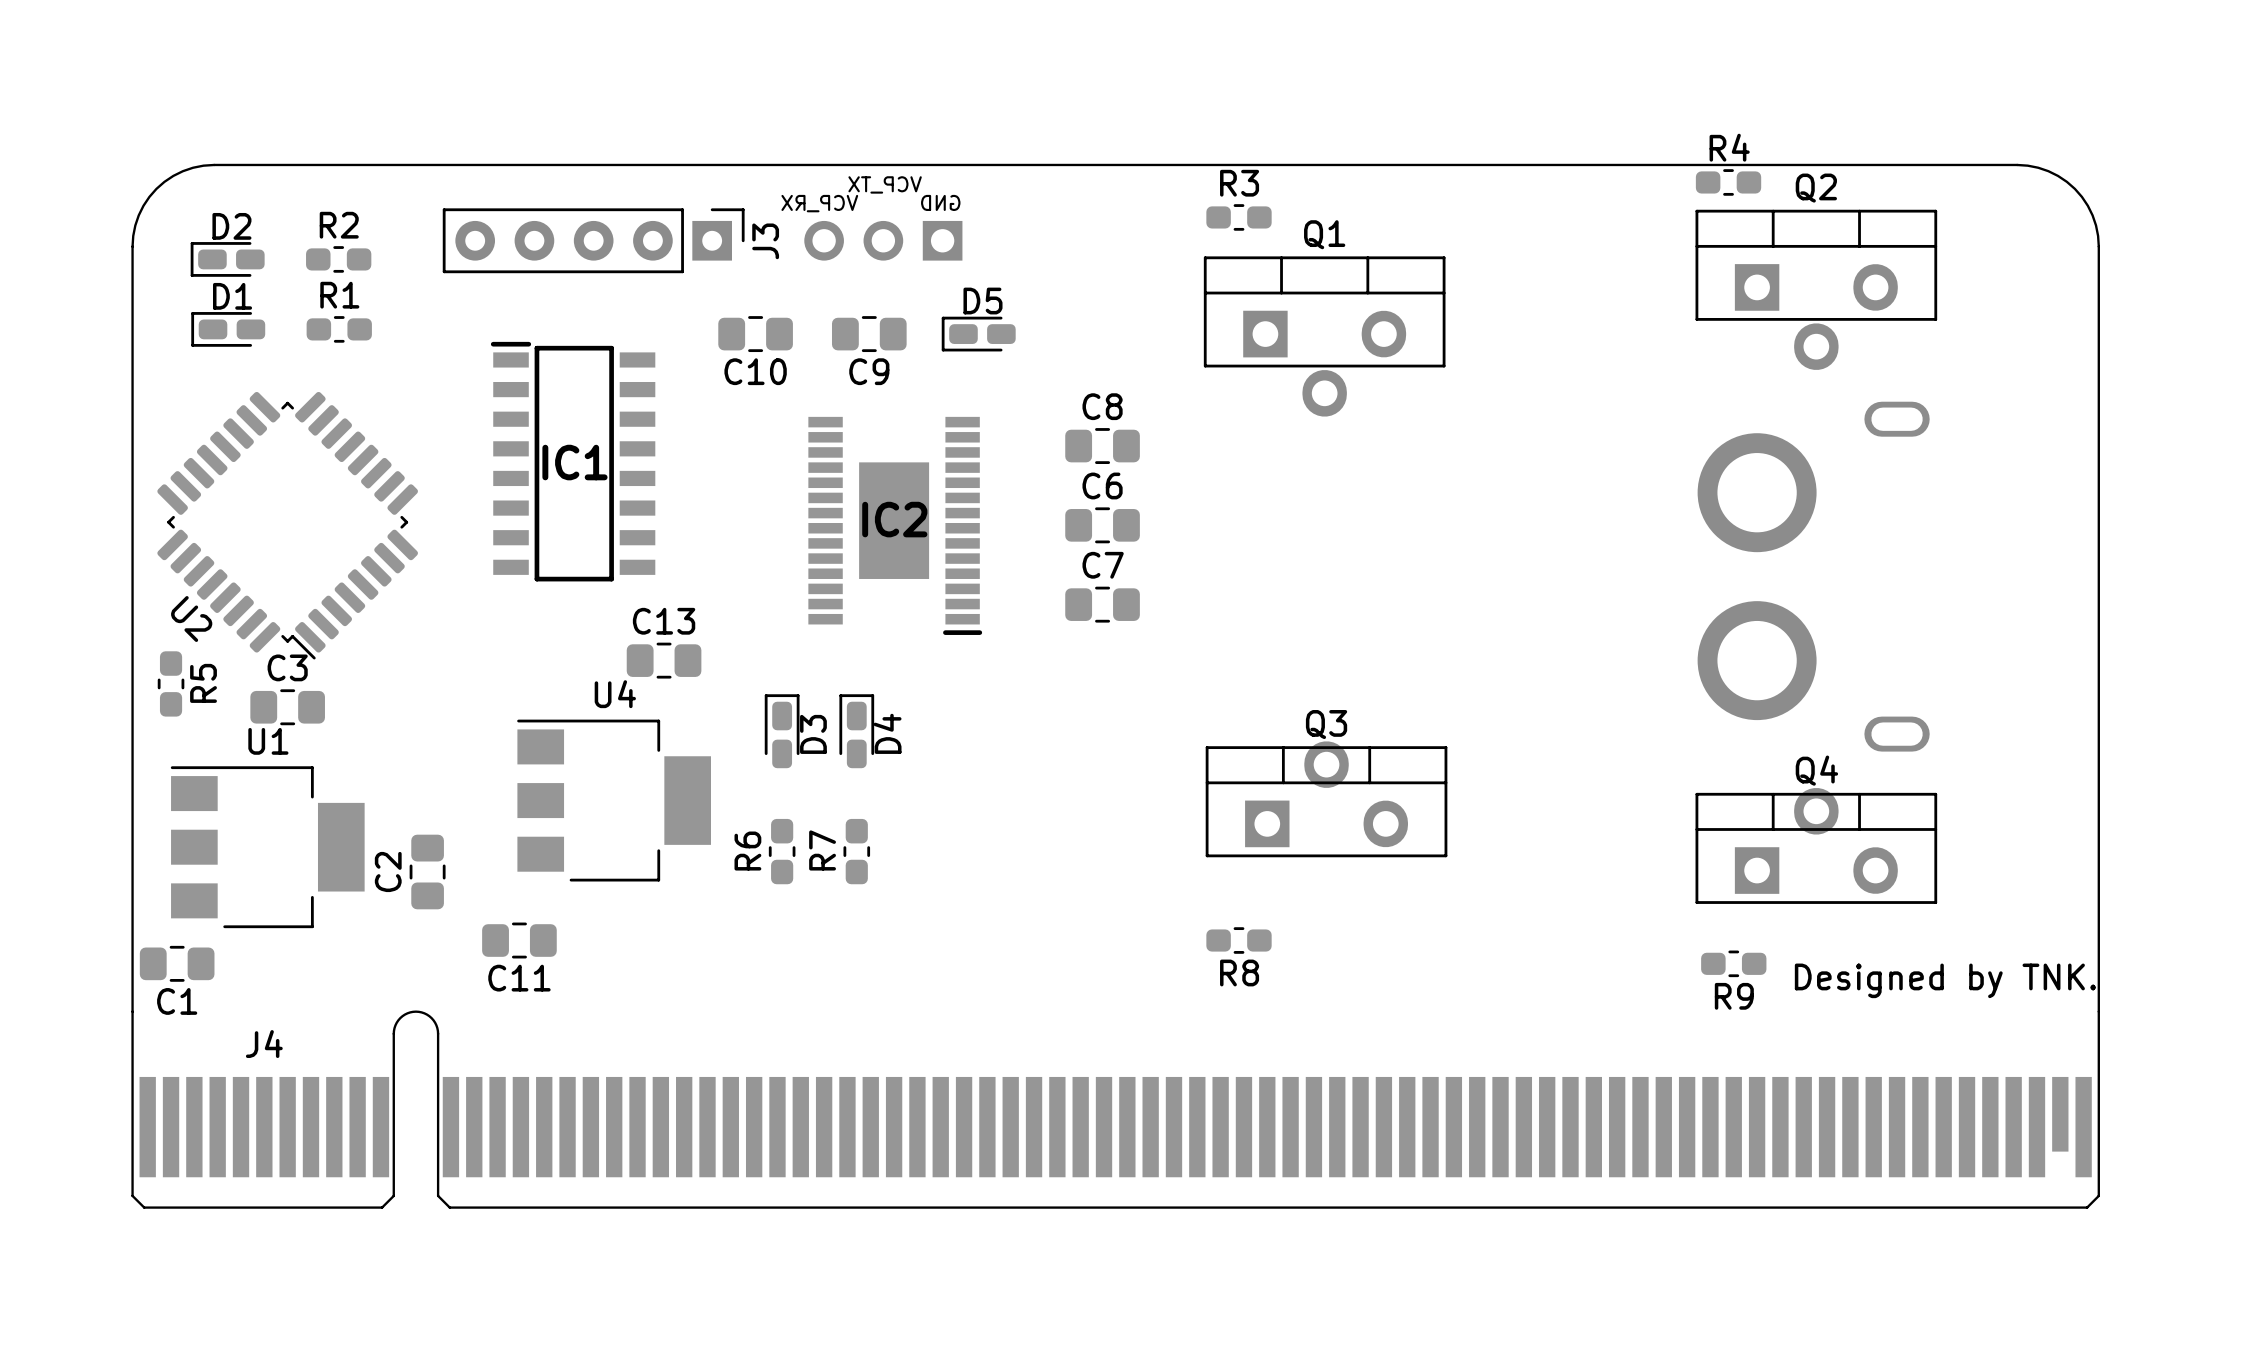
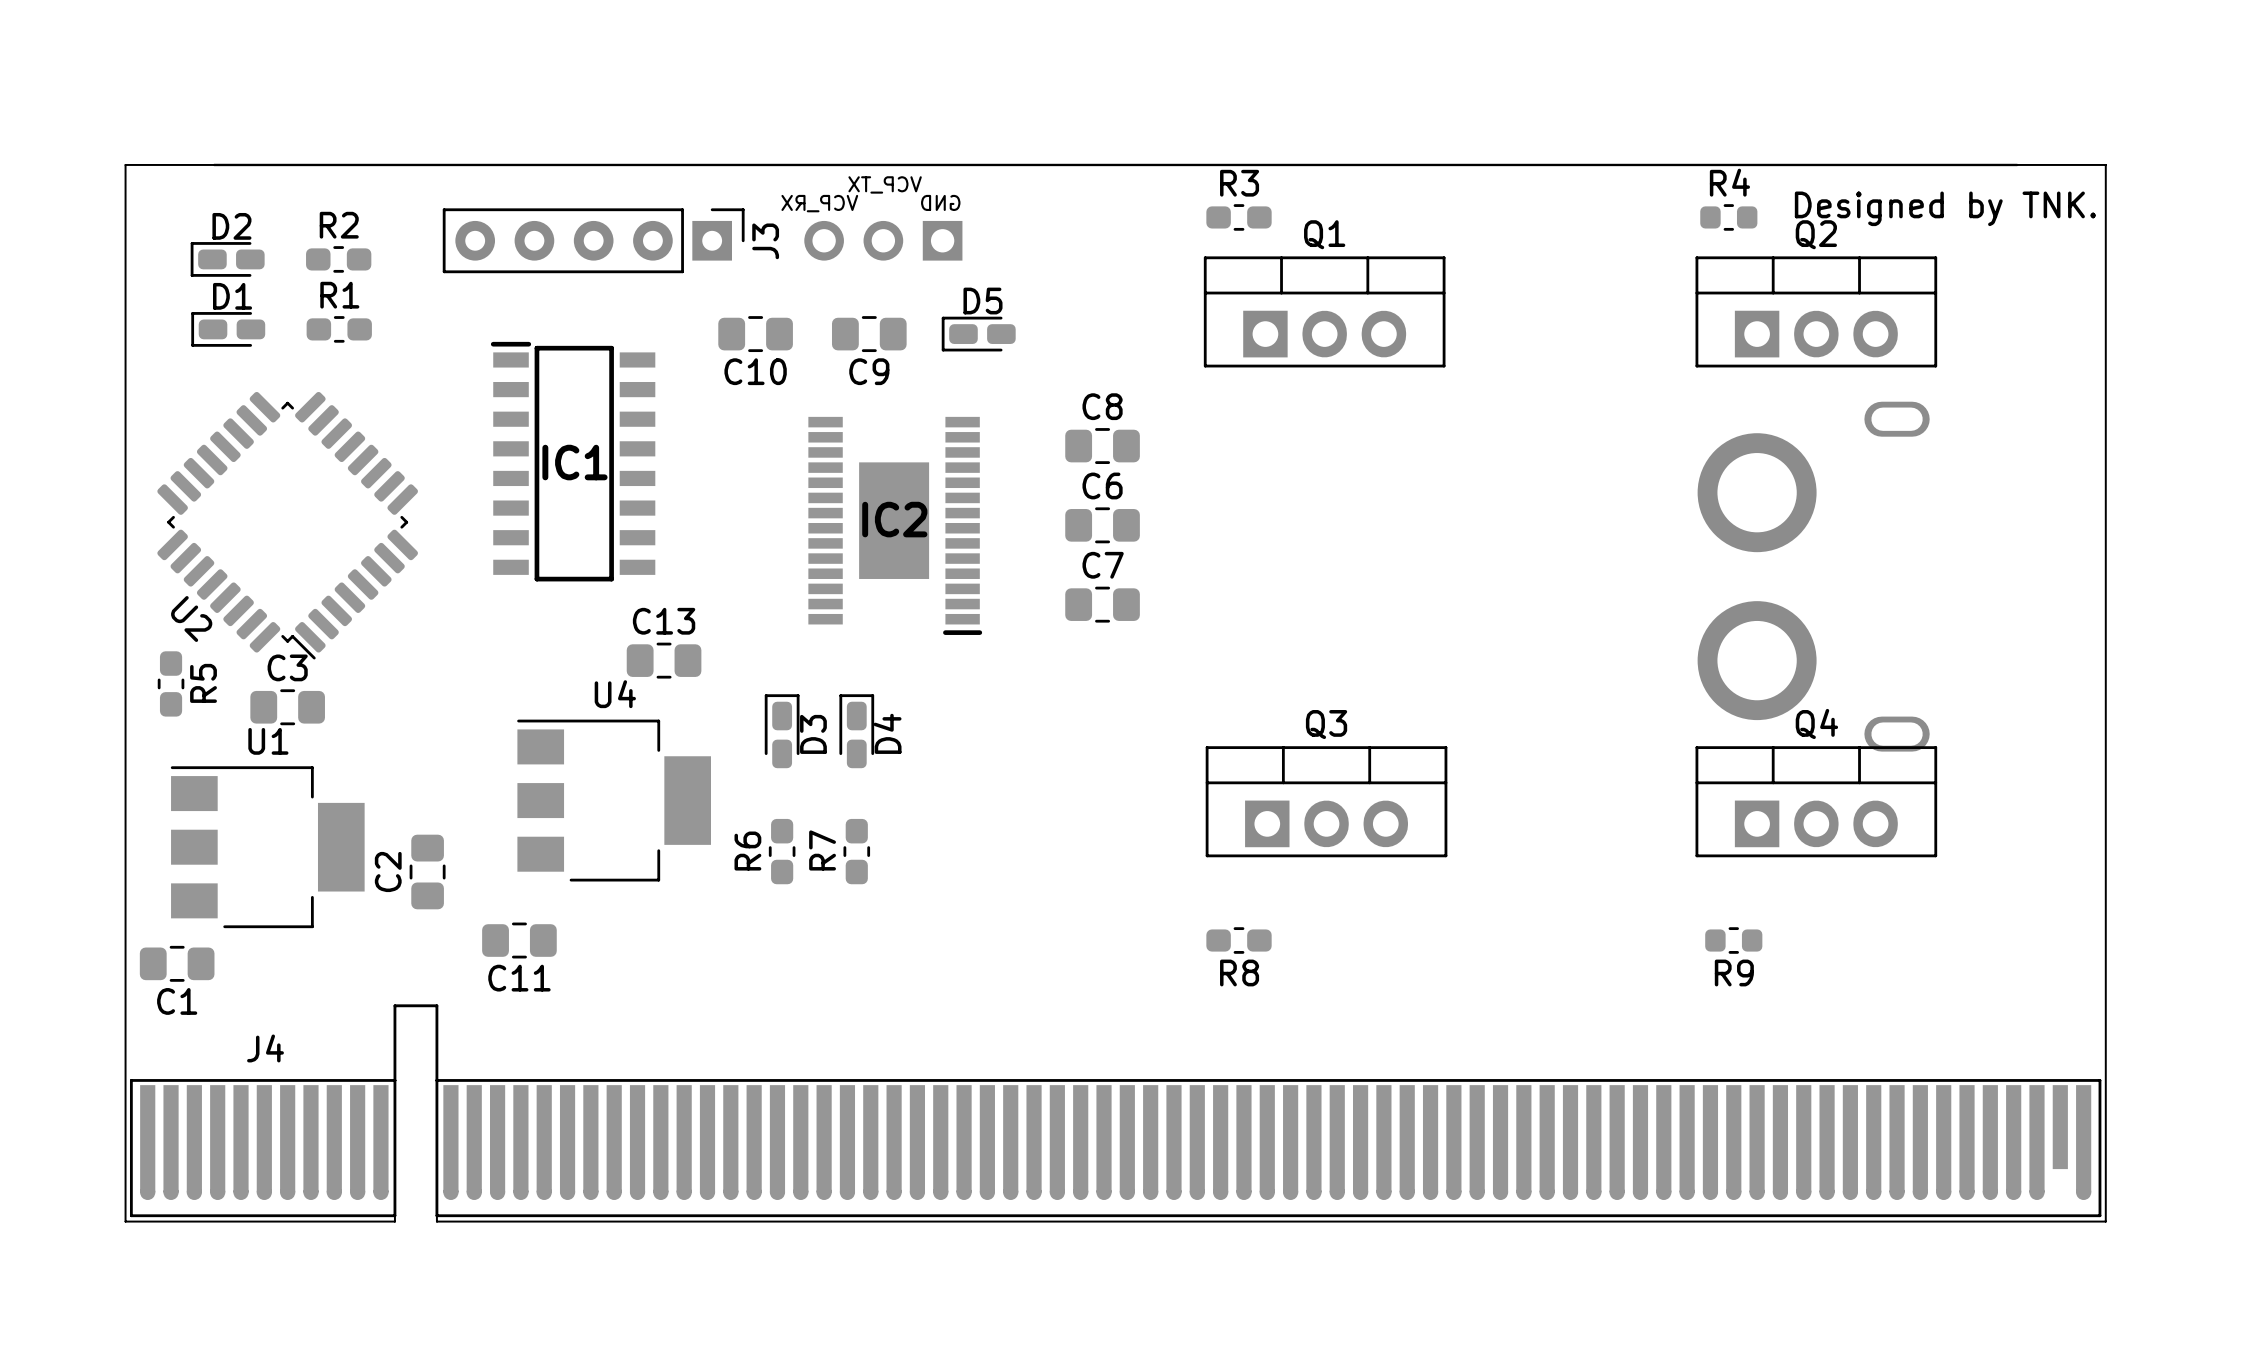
board edge: (214, 164) (182, 171) (156, 188) (143, 205) (133, 235) (132, 1011) -> (214, 164) (125, 164) (125, 1221) (394, 1221) (394, 1005) (436, 1005) (436, 1221) (2105, 1221) (2105, 164) (2017, 164)
board edge: (2017, 164) (2038, 167) (2066, 181) (2087, 205) (2098, 235) (2098, 1011) -> none
R4 footprint: [1695, 169, 1762, 196] -> [1700, 204, 1758, 231]
text: none -> Designed by TNK. (1945, 208)
Q2 footprint: [1695, 209, 1938, 370] -> [1695, 256, 1938, 368]
Q1 footprint: [1203, 256, 1446, 417] -> [1203, 256, 1446, 368]
Q3 footprint: [1205, 741, 1448, 858] -> [1205, 746, 1448, 858]
Q4 footprint: [1695, 787, 1938, 904] -> [1695, 746, 1938, 858]
R9 footprint: [1701, 950, 1767, 978] -> [1705, 927, 1763, 954]
text: Designed by TNK. (1945, 980) -> none
J4 footprint: [131, 1010, 2100, 1209] -> [129, 1004, 2102, 1218]

